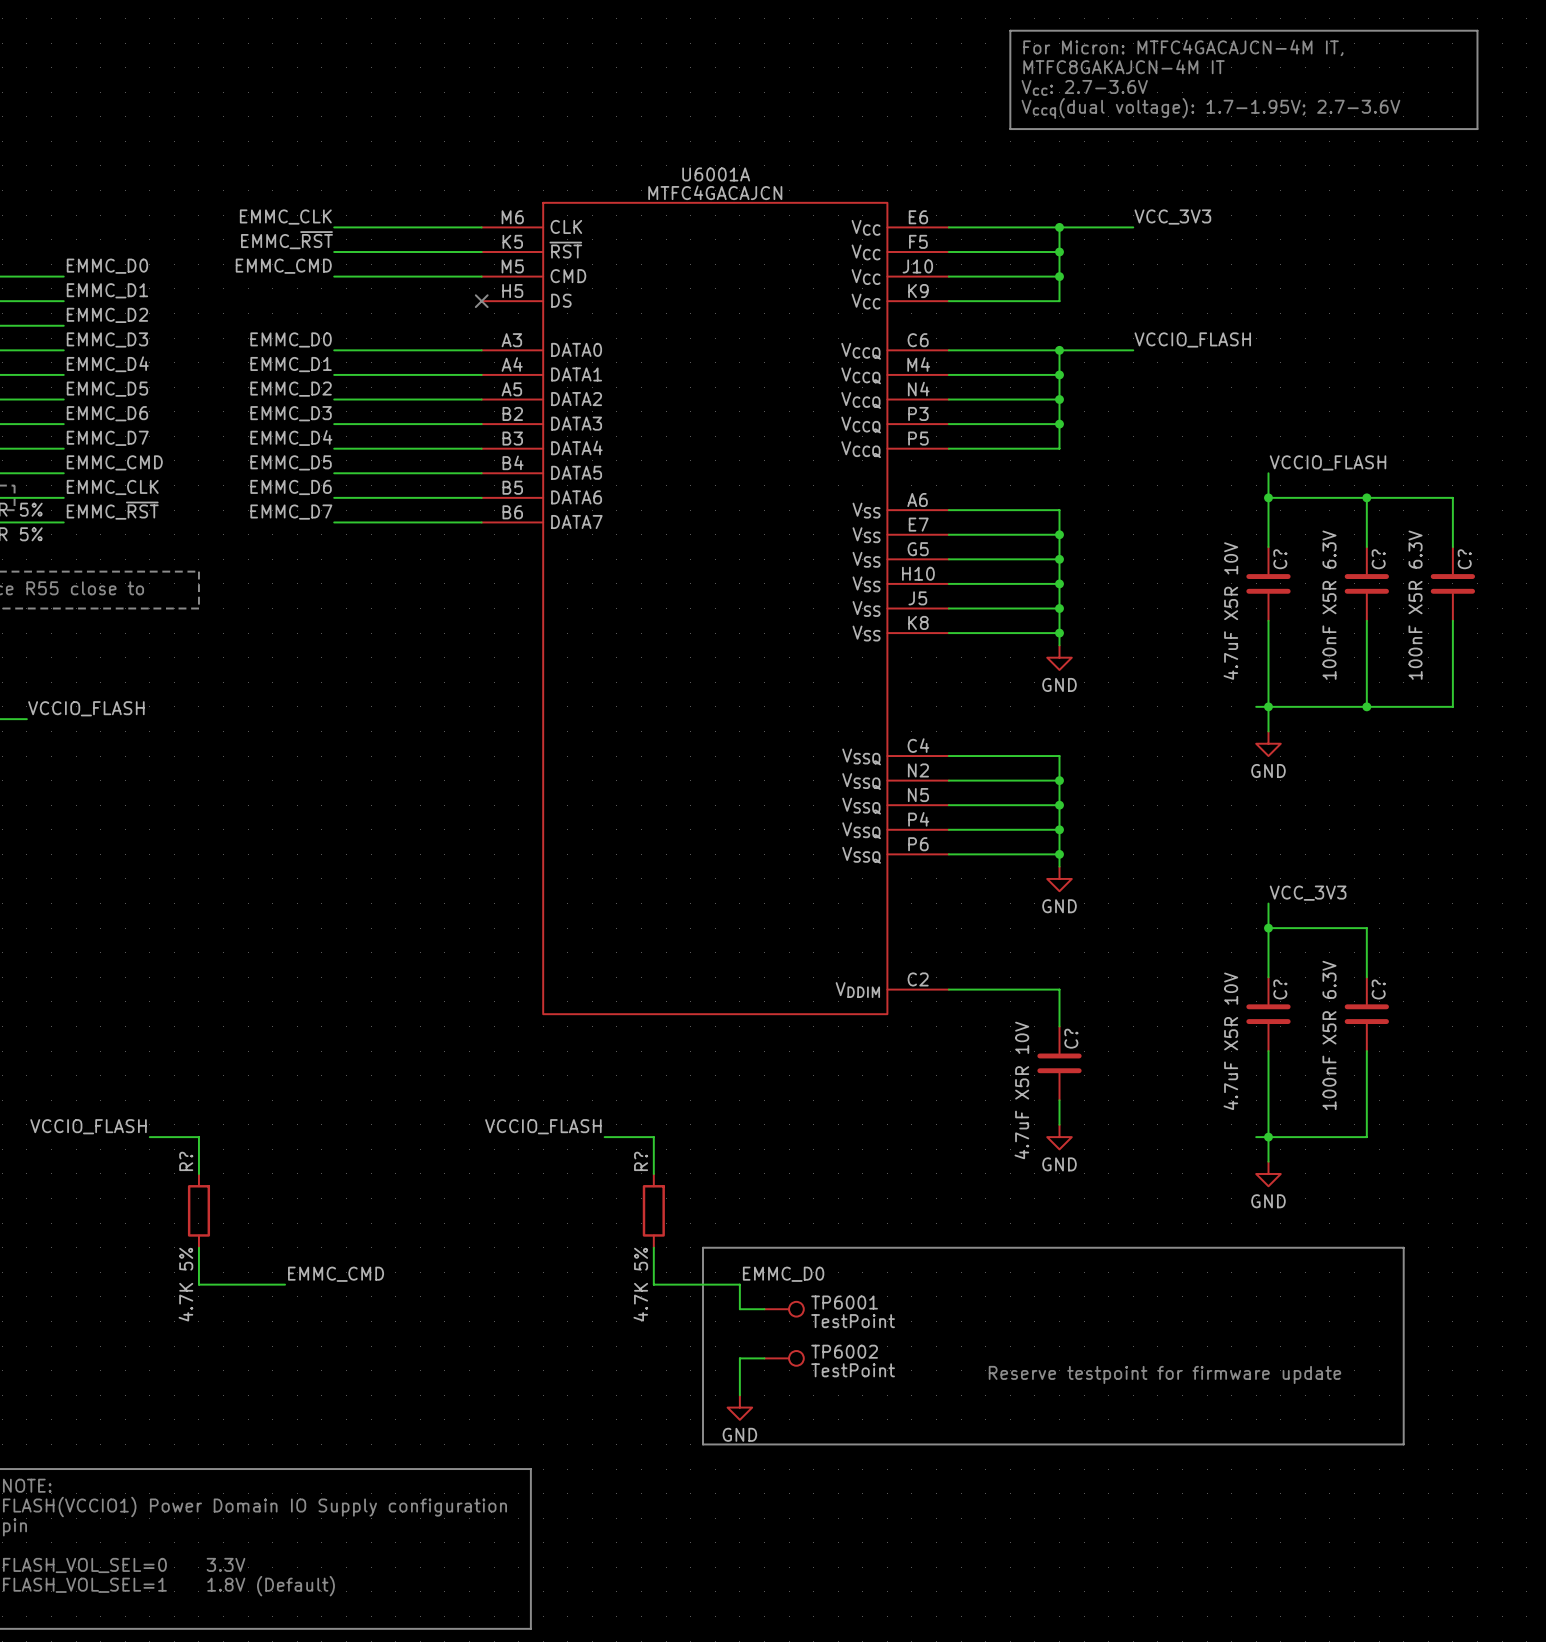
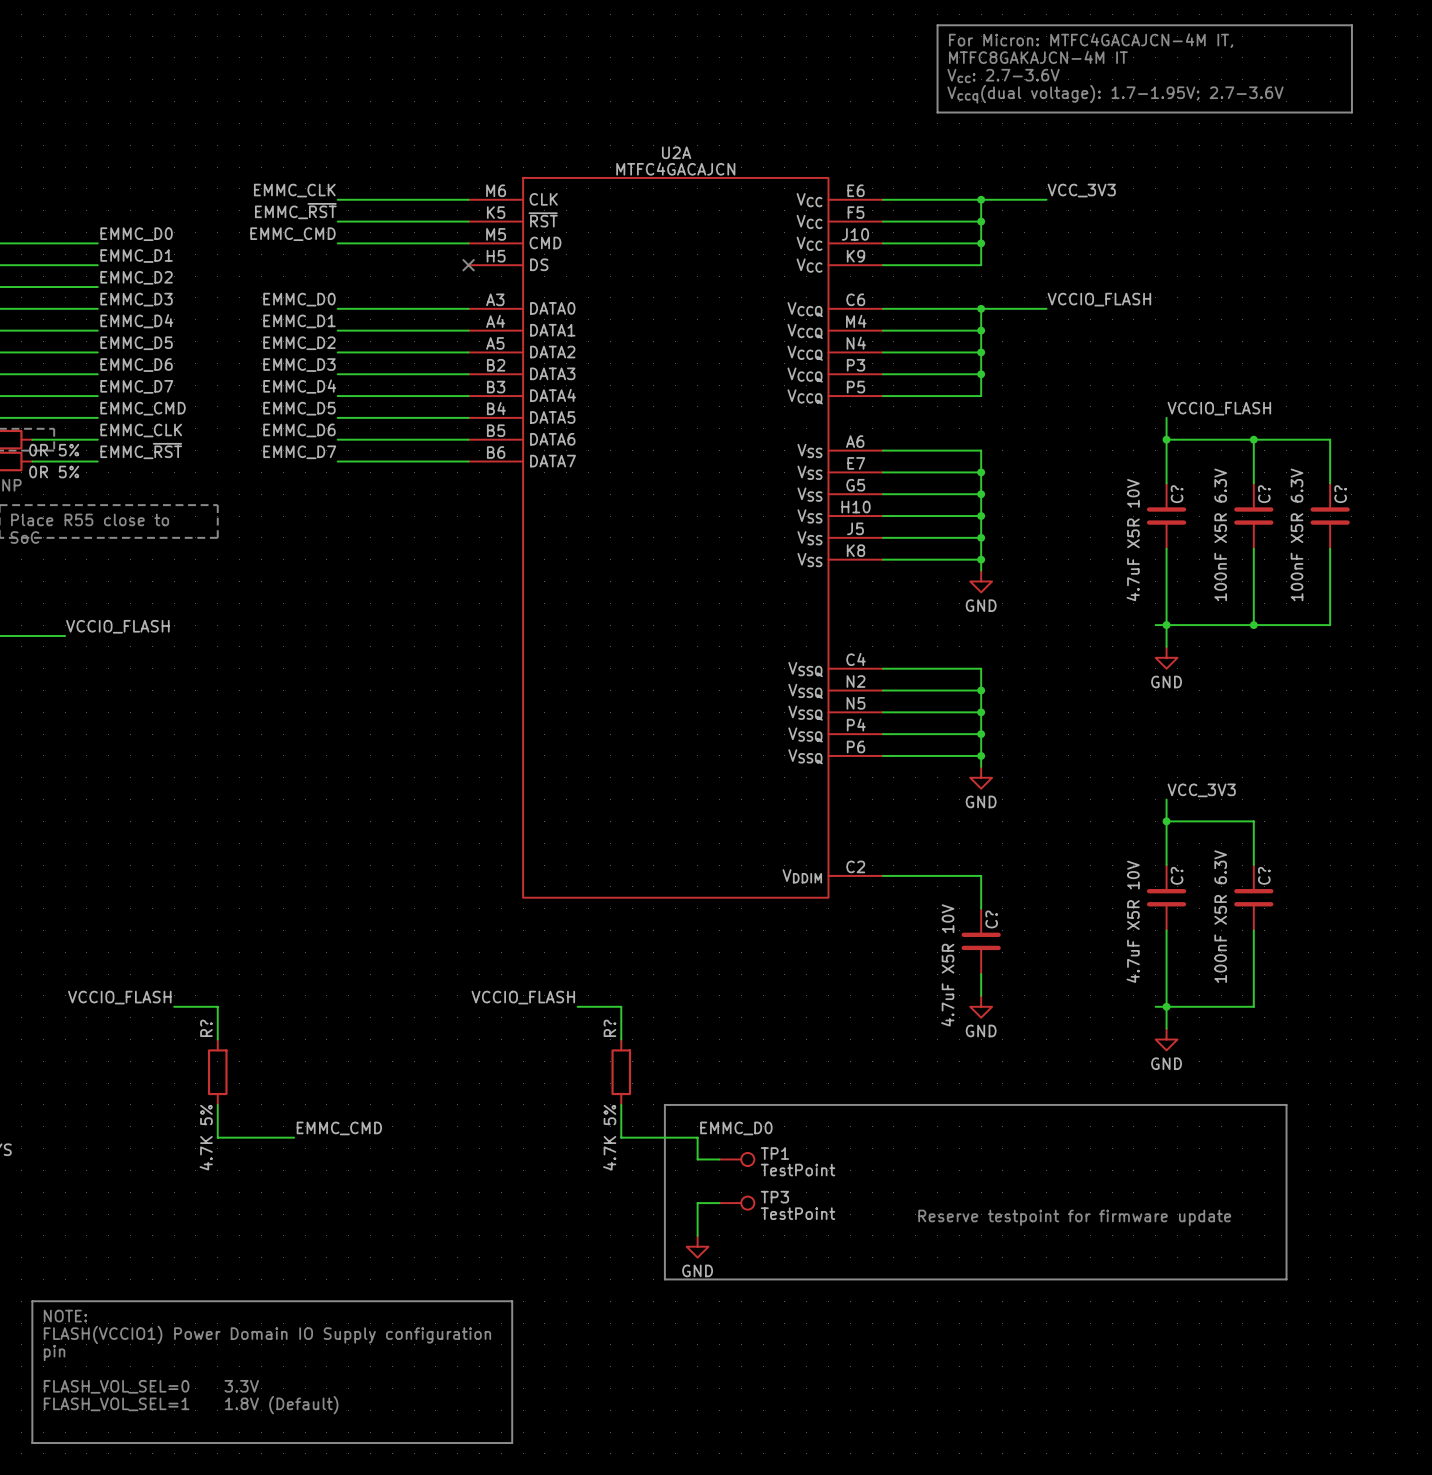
U6001A name: U6001A (716, 174) -> U2A (676, 152)
TP6001 name: TP6001 (844, 1302) -> TP1 (774, 1153)
TP6002 name: TP6002 (844, 1351) -> TP3 (774, 1197)

